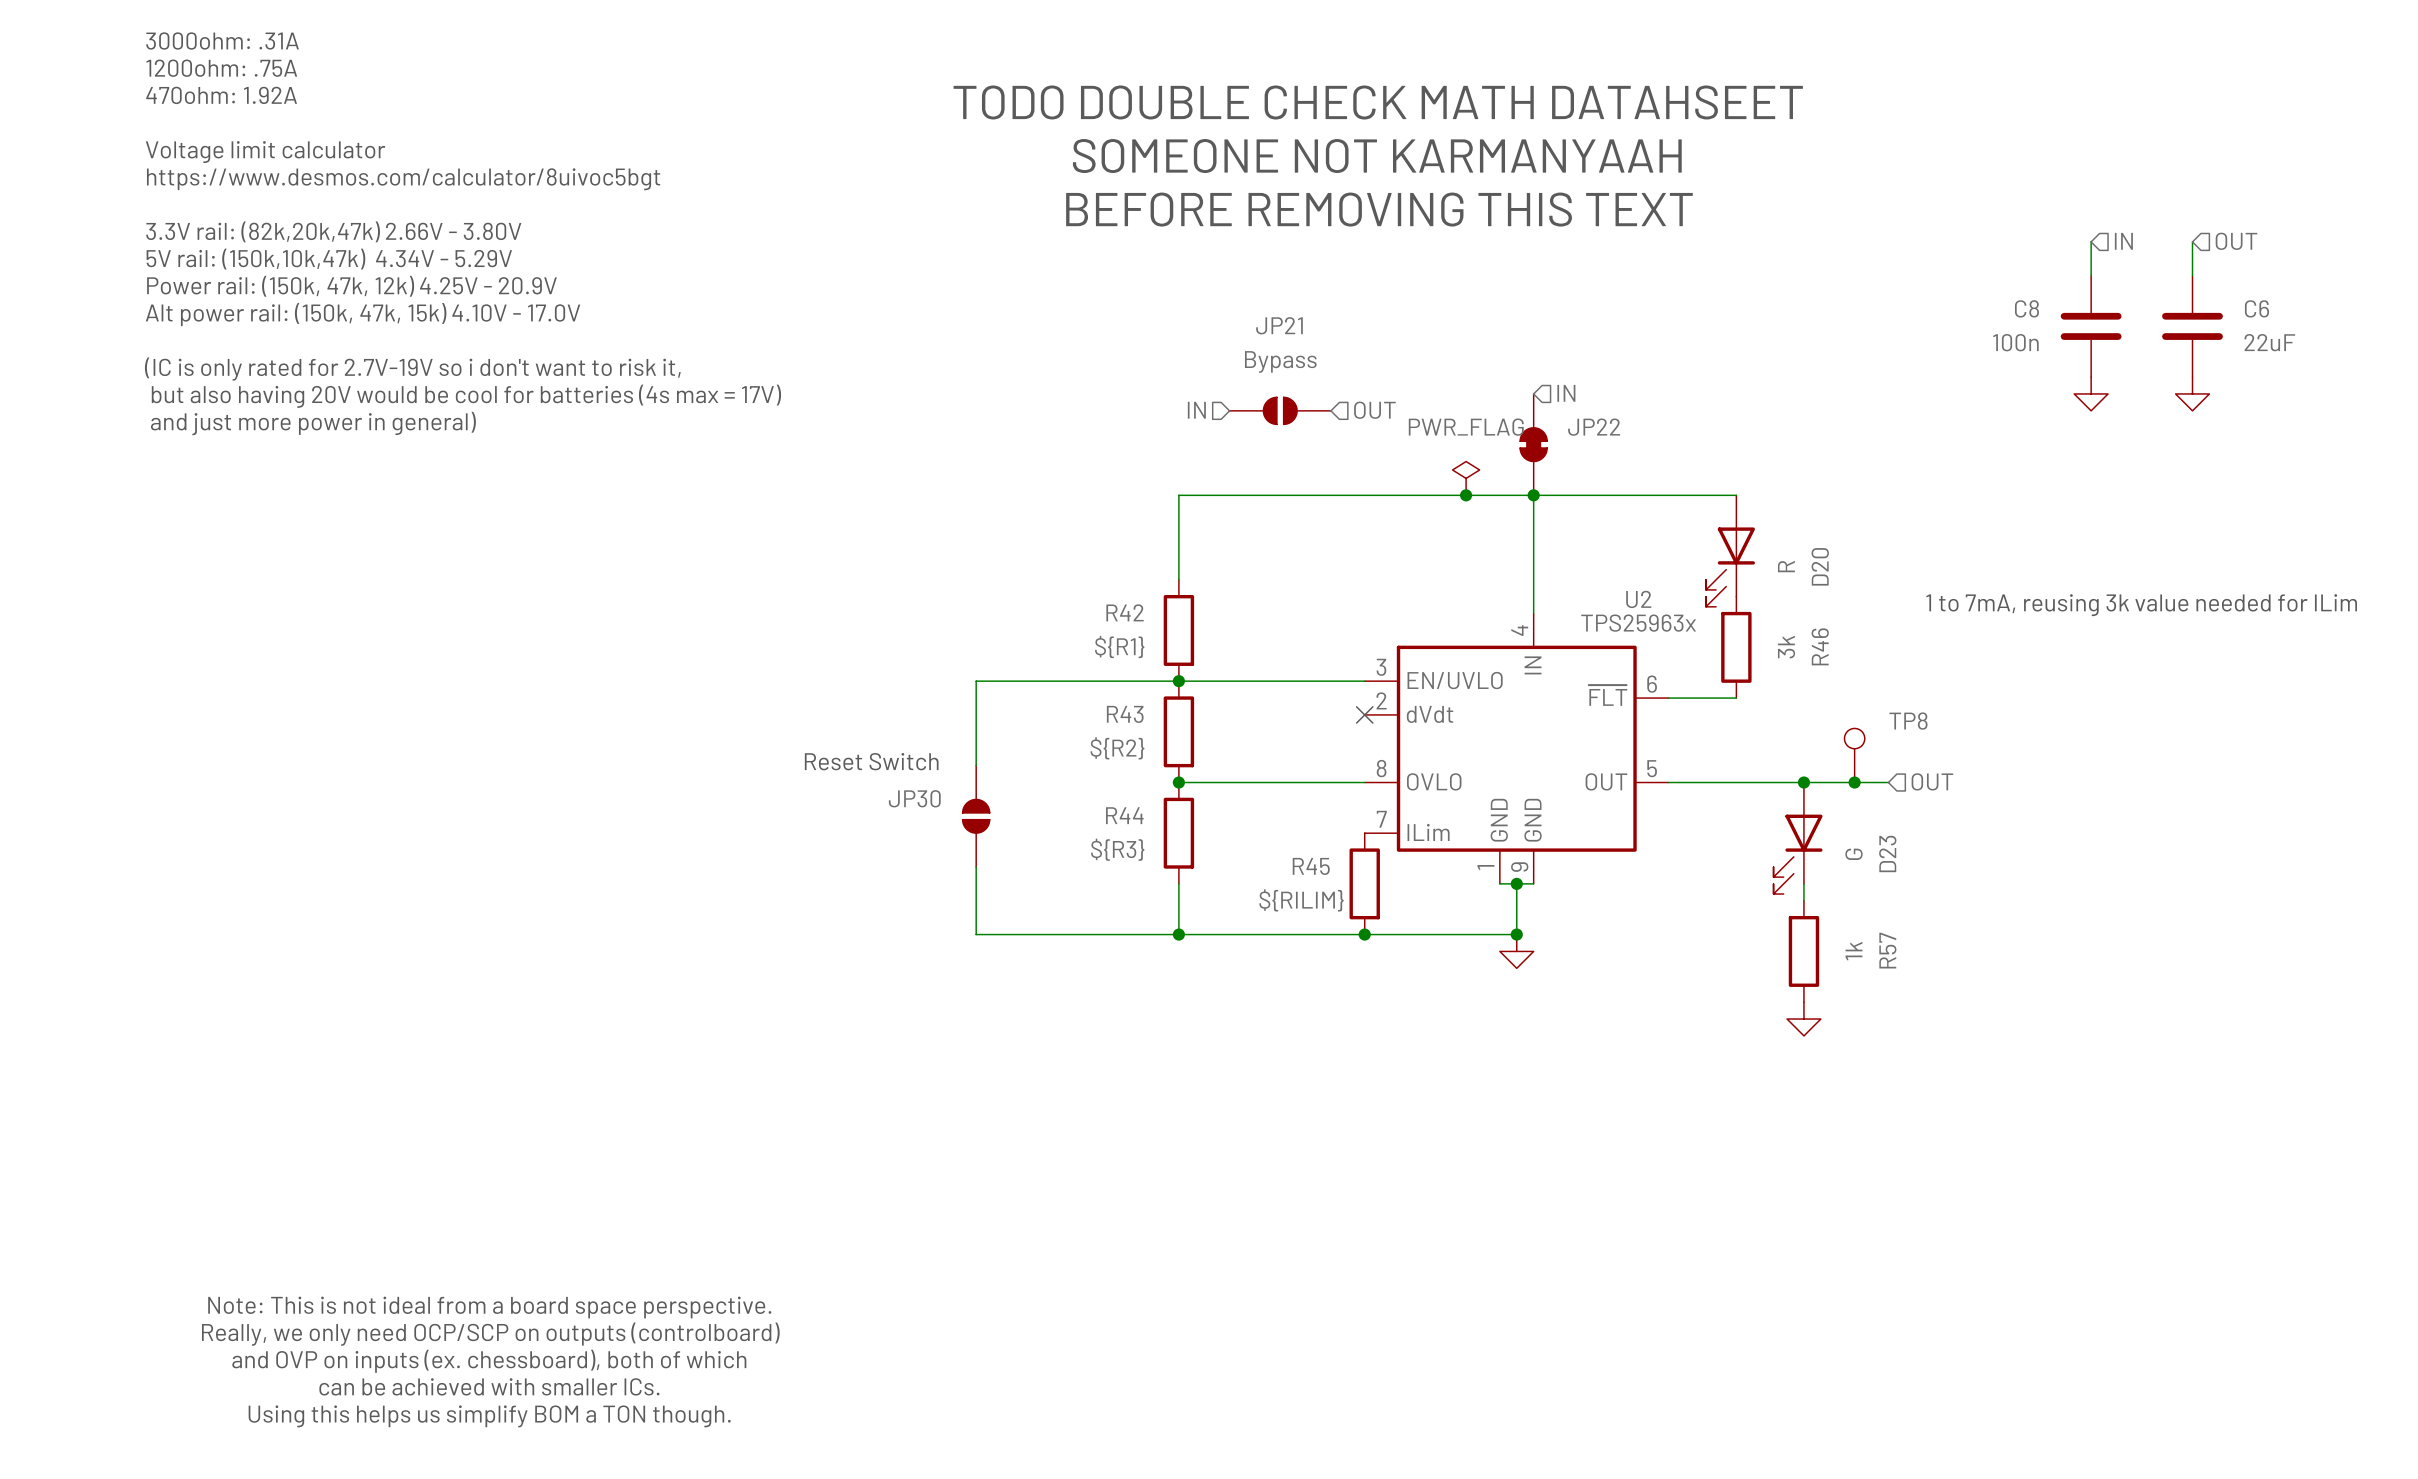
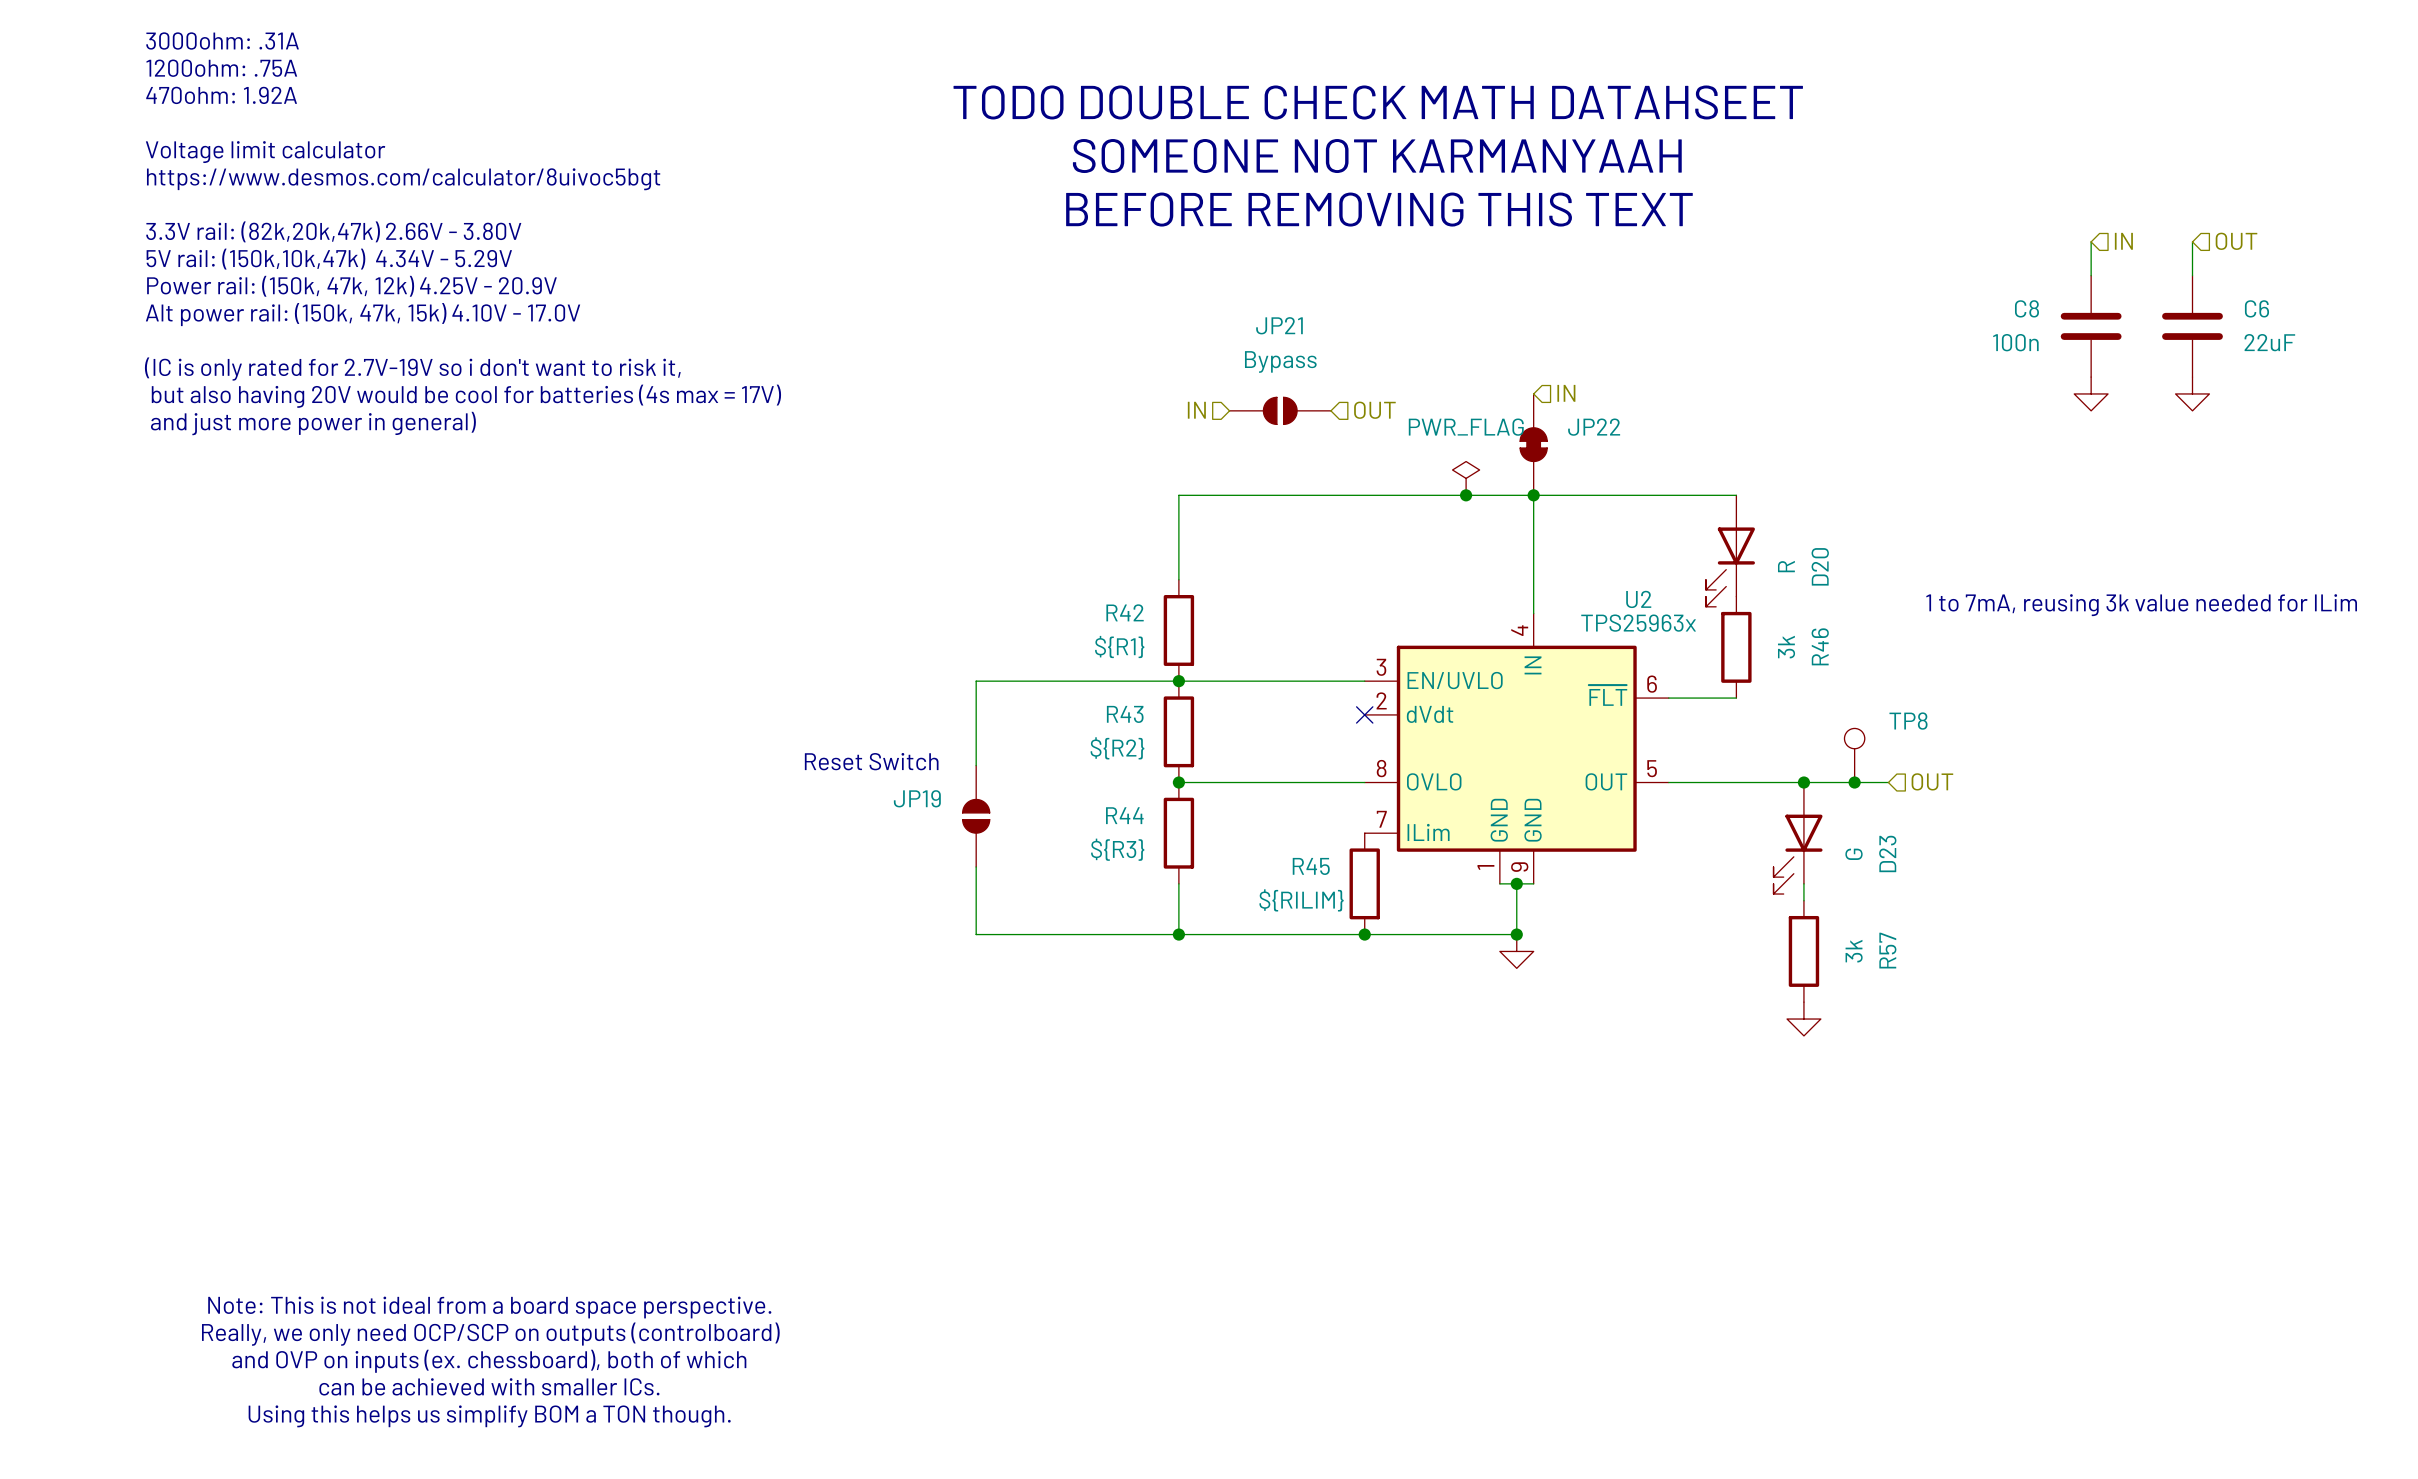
JP30 name: JP30 (914, 798) -> JP19 (917, 798)
R57 value: 1k (1854, 951) -> 3k (1854, 951)

